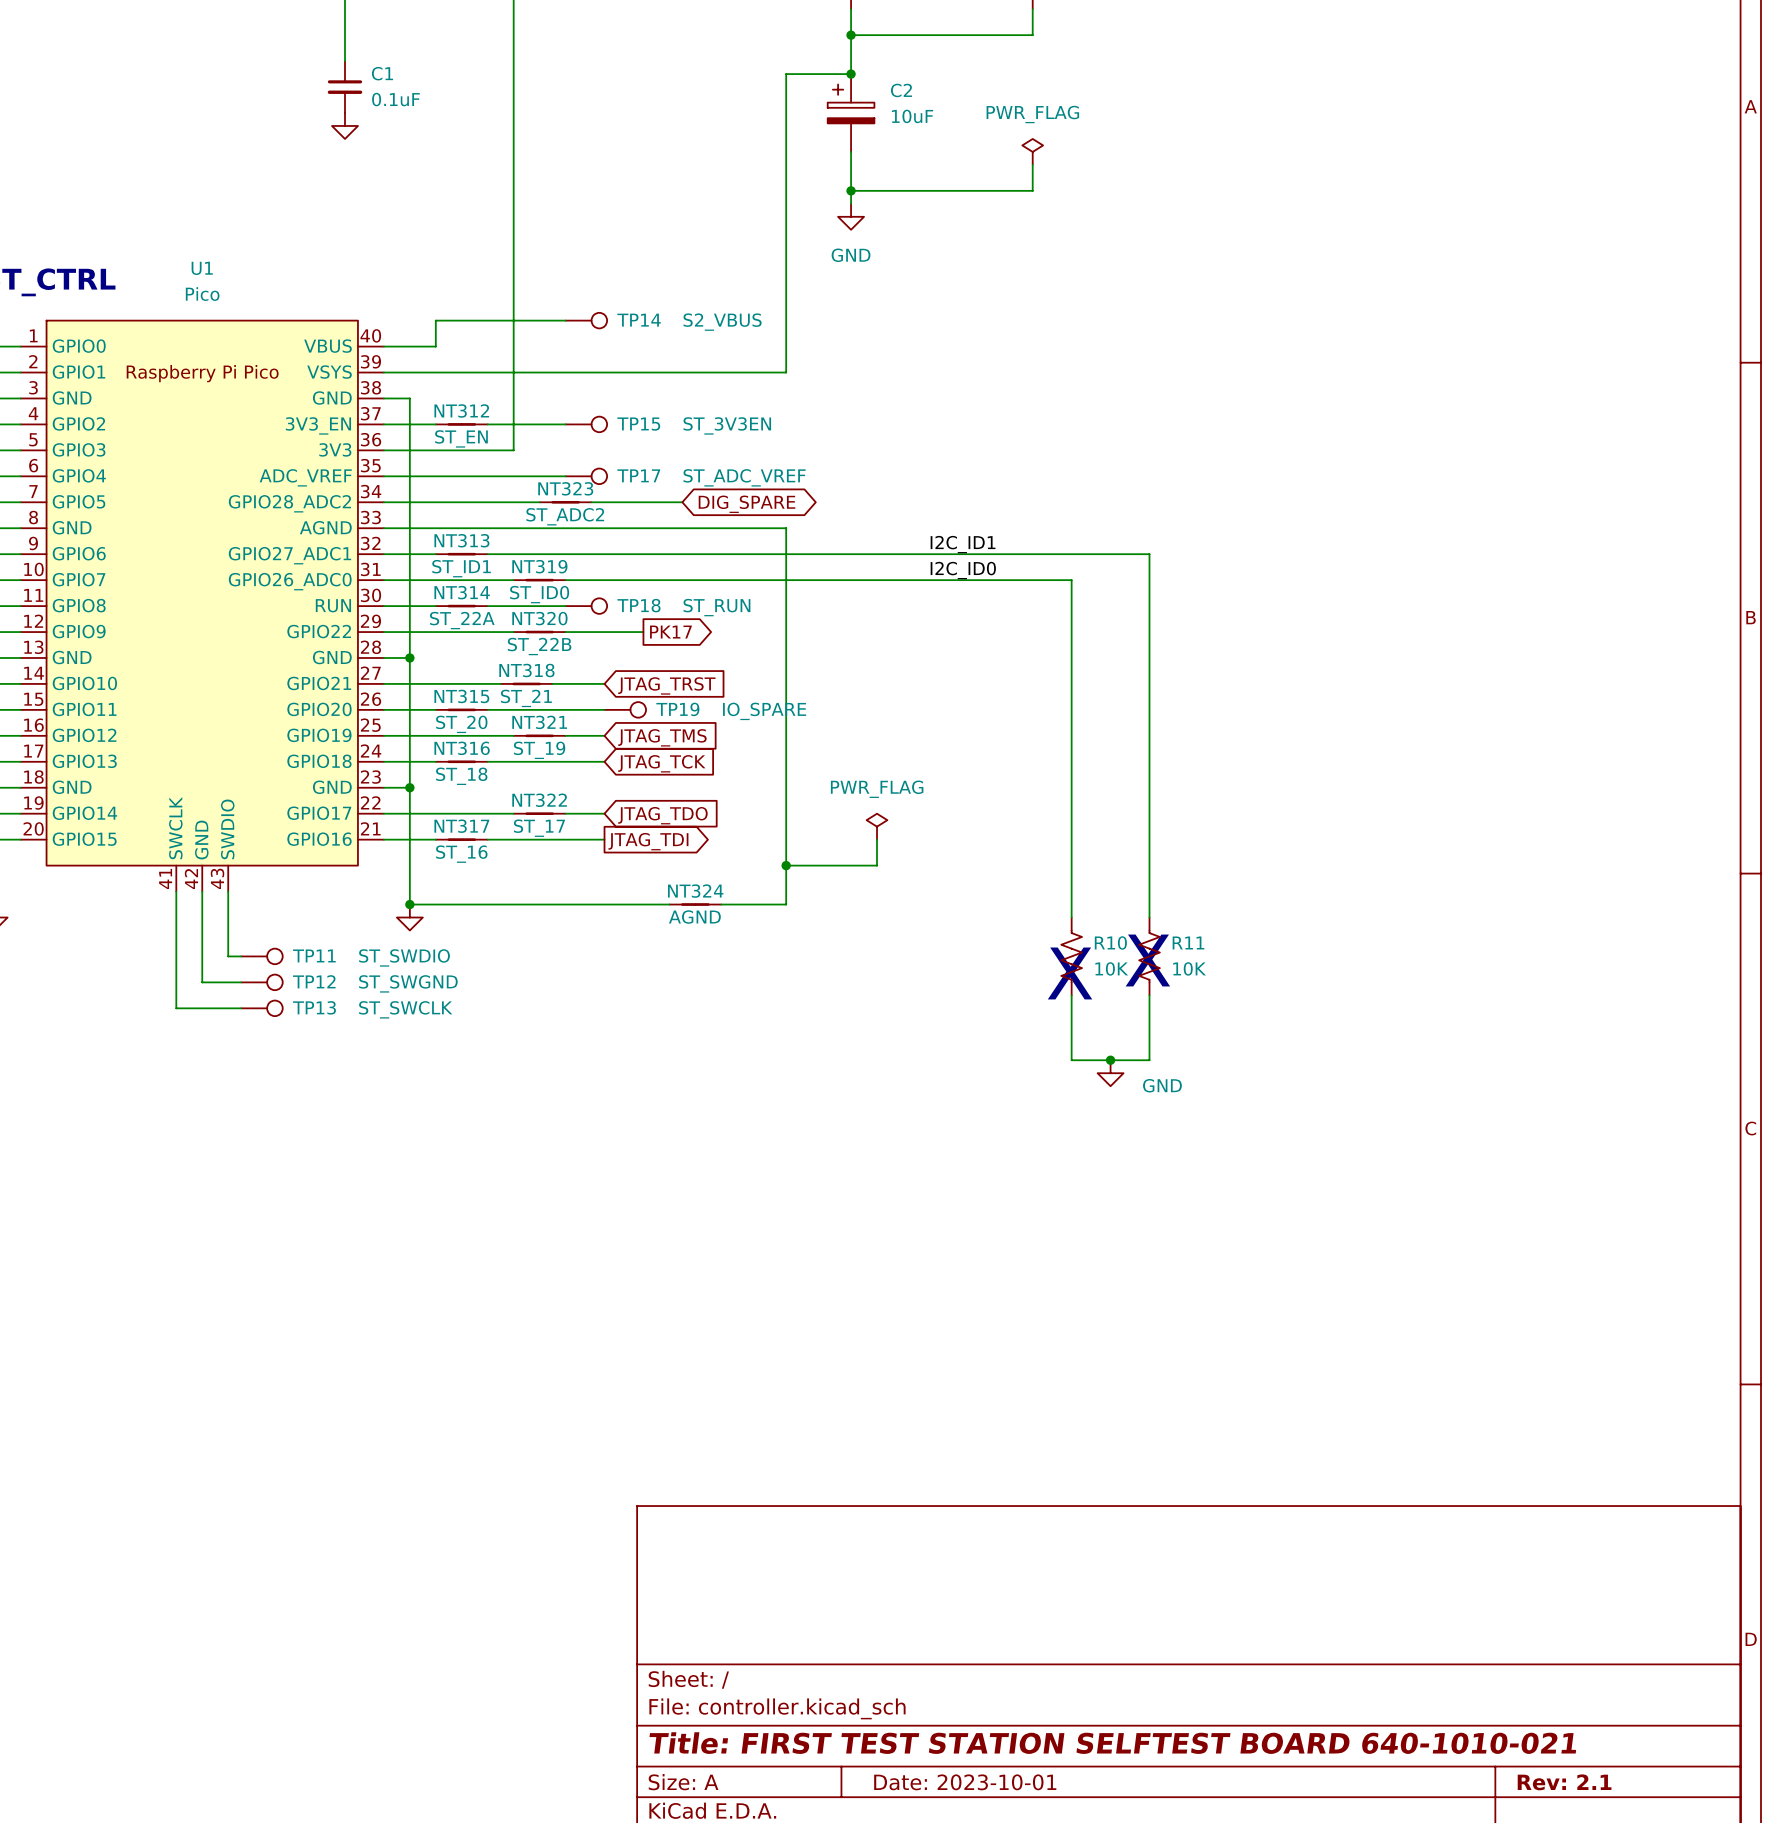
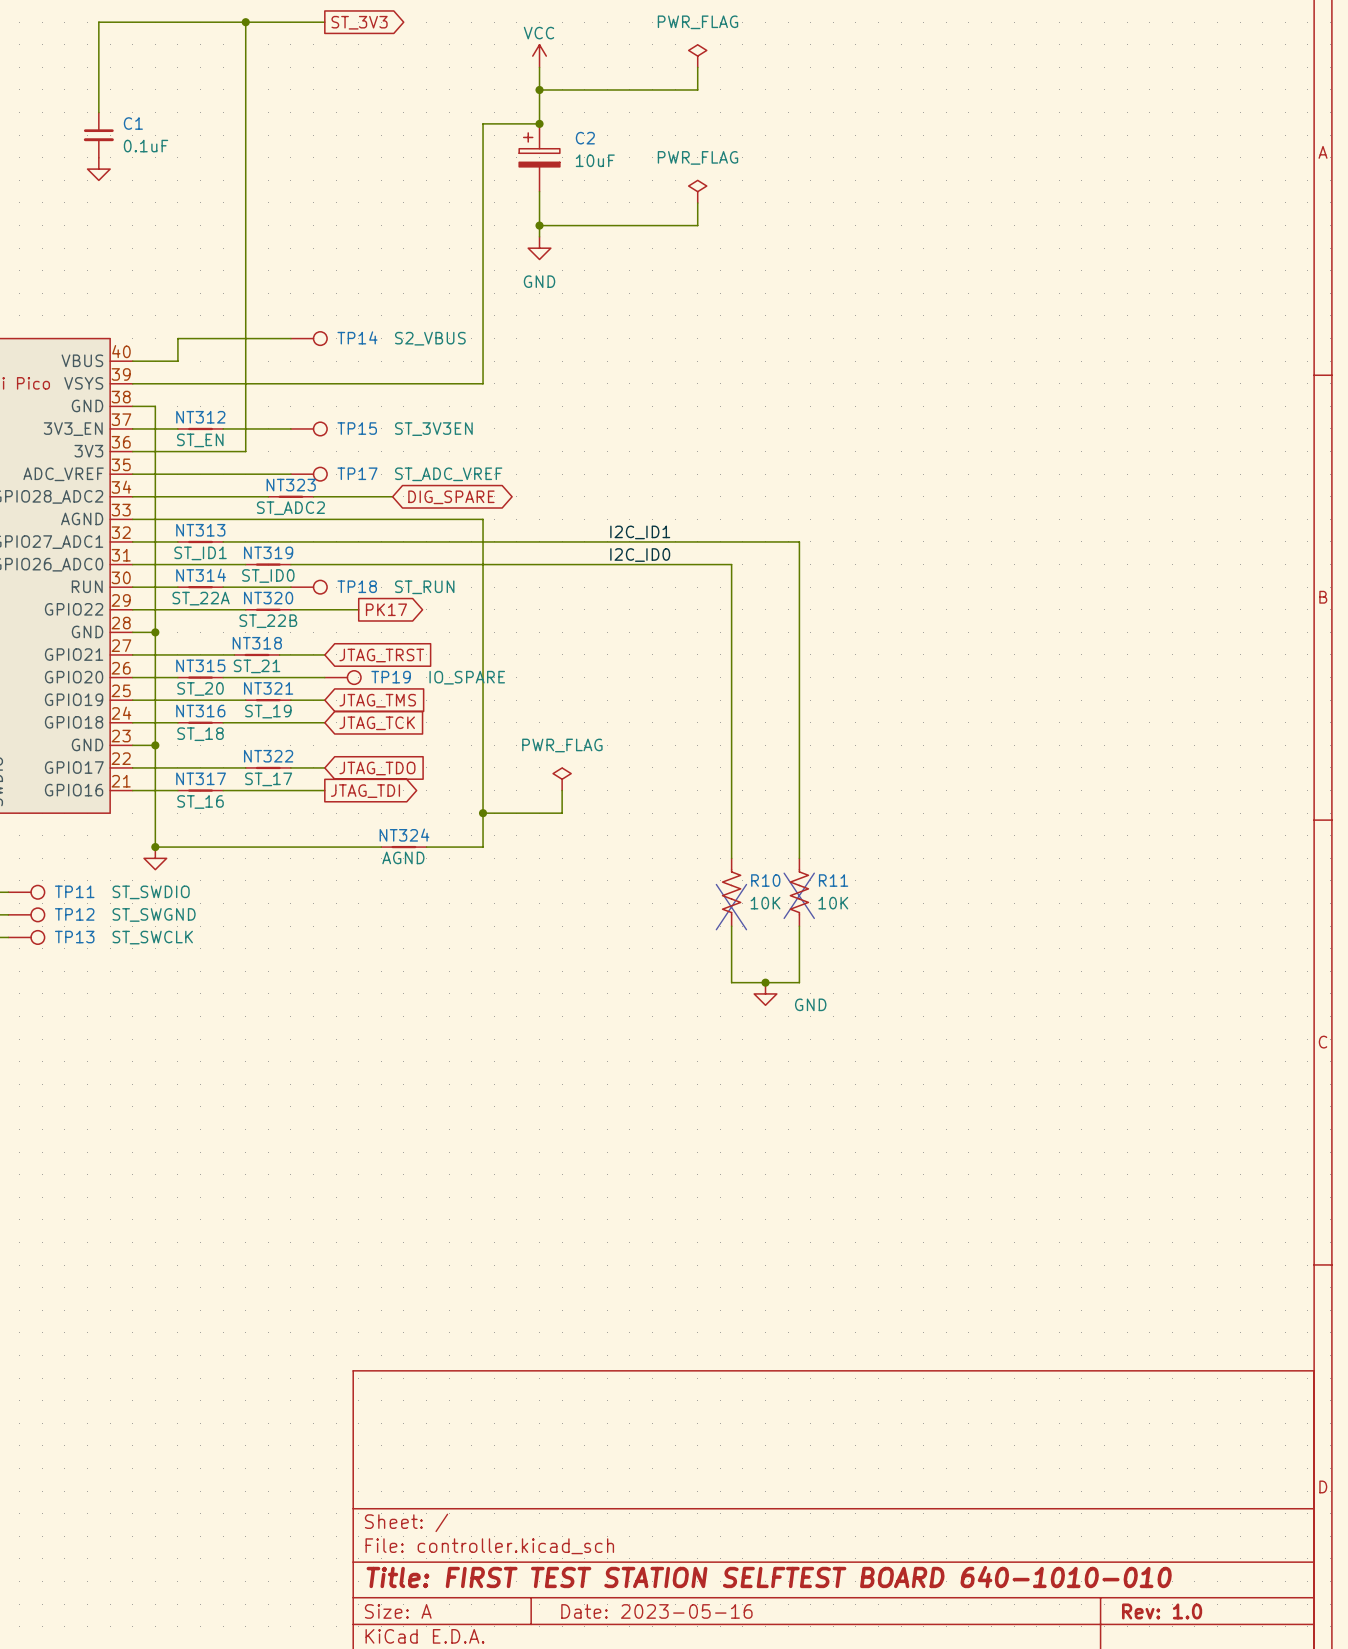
title block: Title: FIRST TEST STATION SELFTEST BOARD 640-1010-021 (1112, 1743) -> Title: FIRST TEST STATION SELFTEST BOARD 640-1010-010 (769, 1577)
title block: Date: 2023-10-01 (965, 1782) -> Date: 2023-05-16 (656, 1611)
title block: Rev: 2.1 (1564, 1782) -> Rev: 1.0 (1162, 1611)

